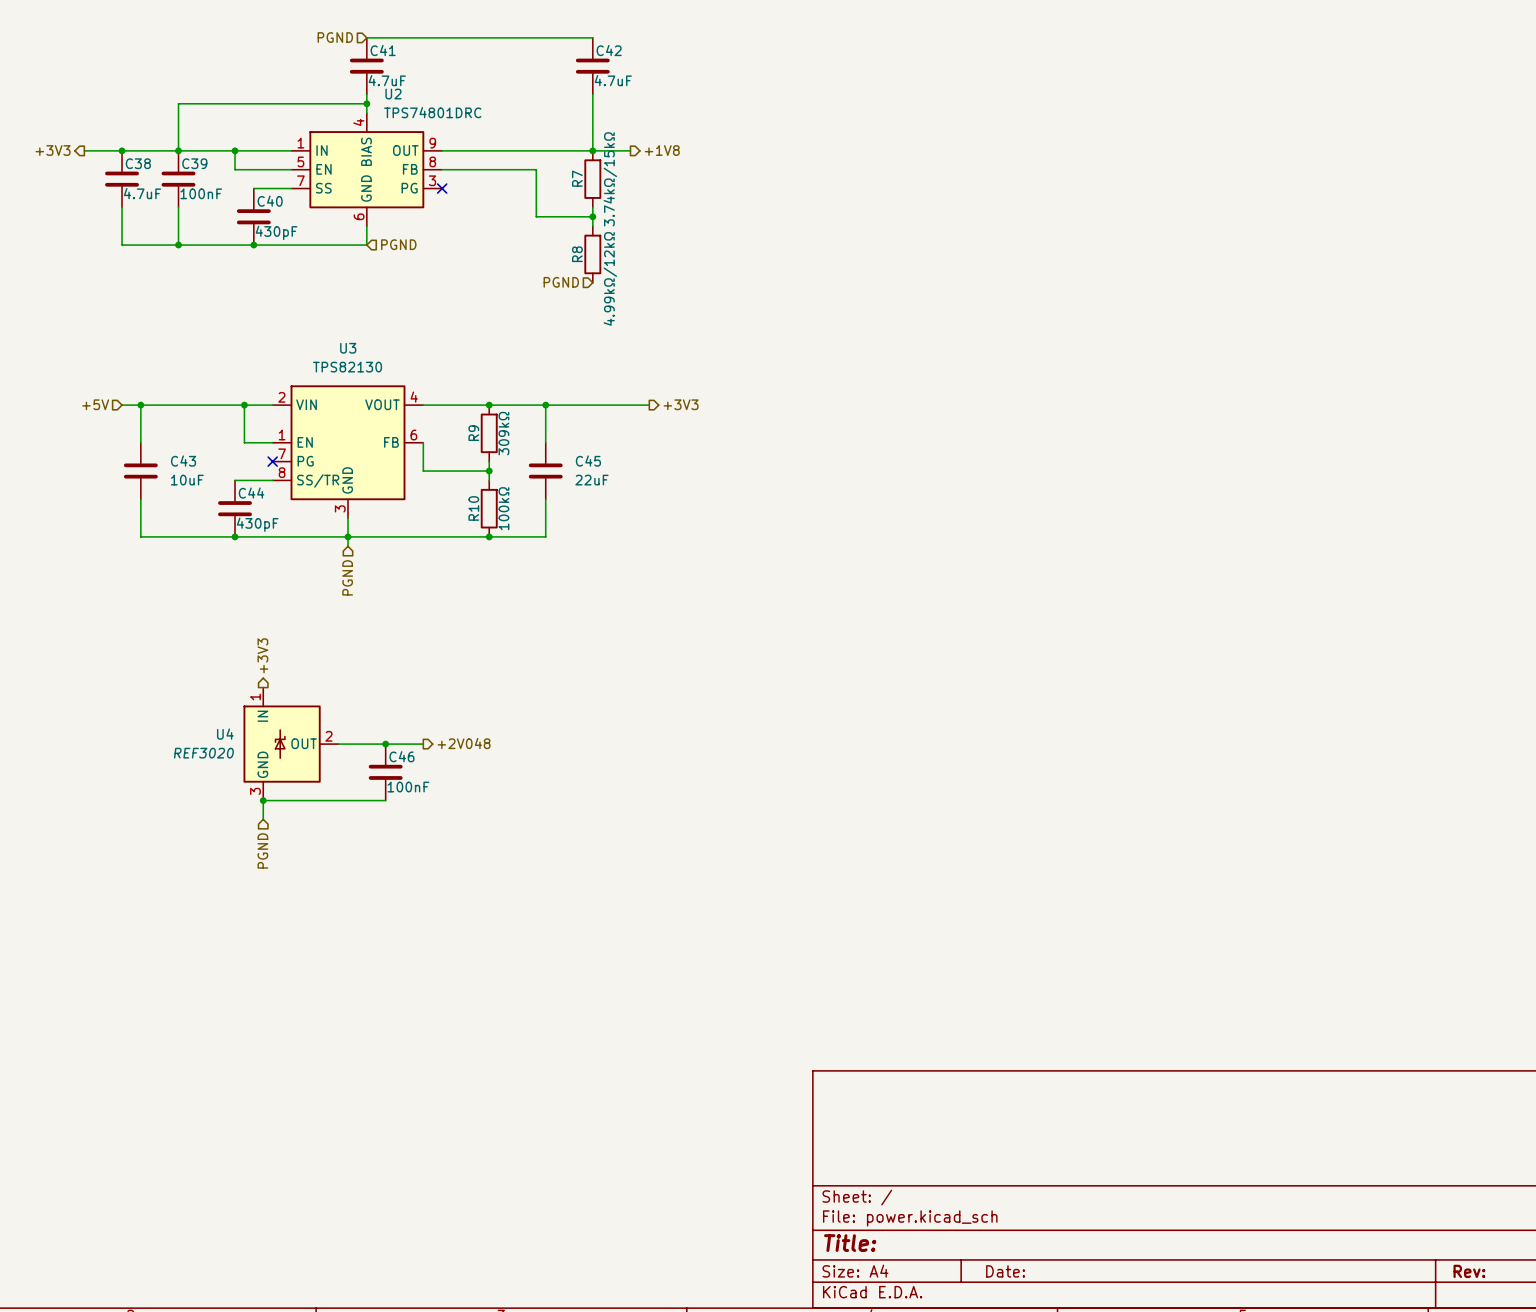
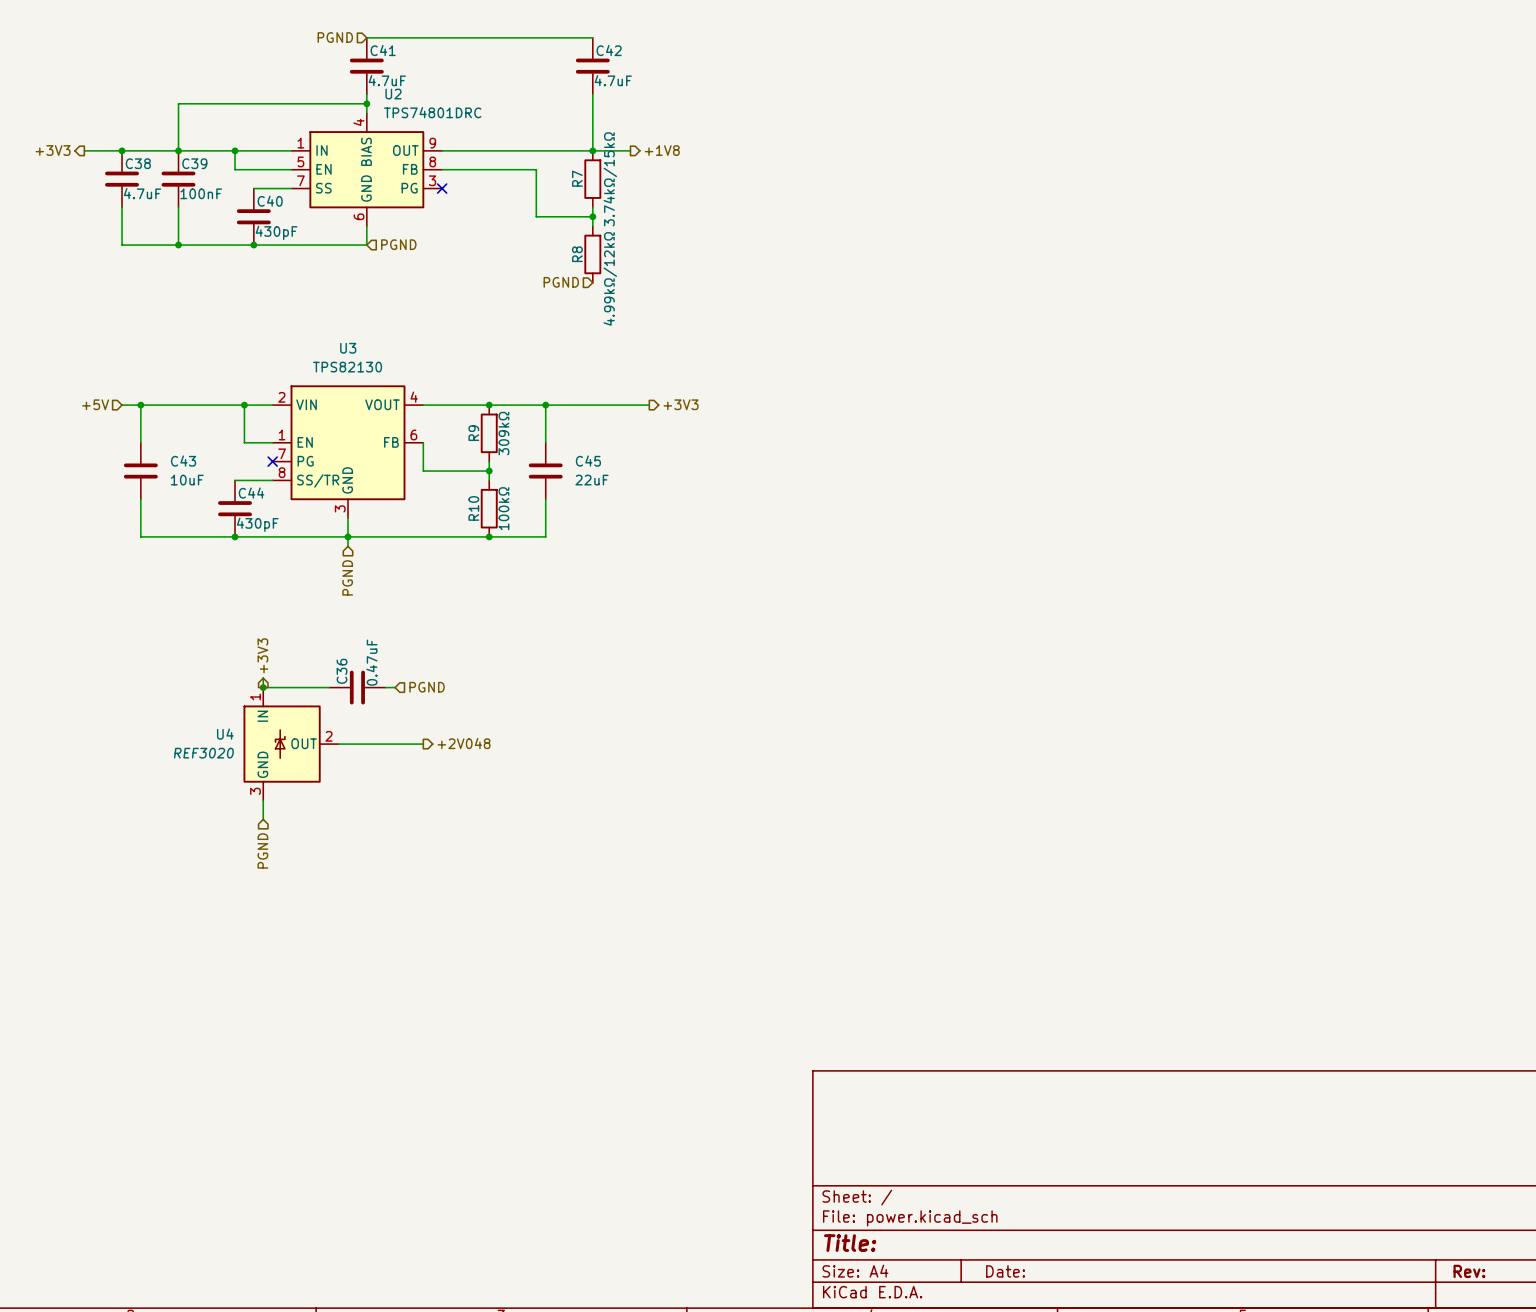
wire: none -> (263, 678) (263, 687) (329, 687)
junction: none -> (263, 687)
C36: none -> 0.47uF (357, 687)
wire: none -> (385, 687) (395, 687)
hierarchical label: none -> PGND (427, 687)
junction: (385, 744) -> none
C46: 100nF (385, 772) -> none
wire: (263, 800) (385, 800) -> none
junction: (263, 800) -> none

